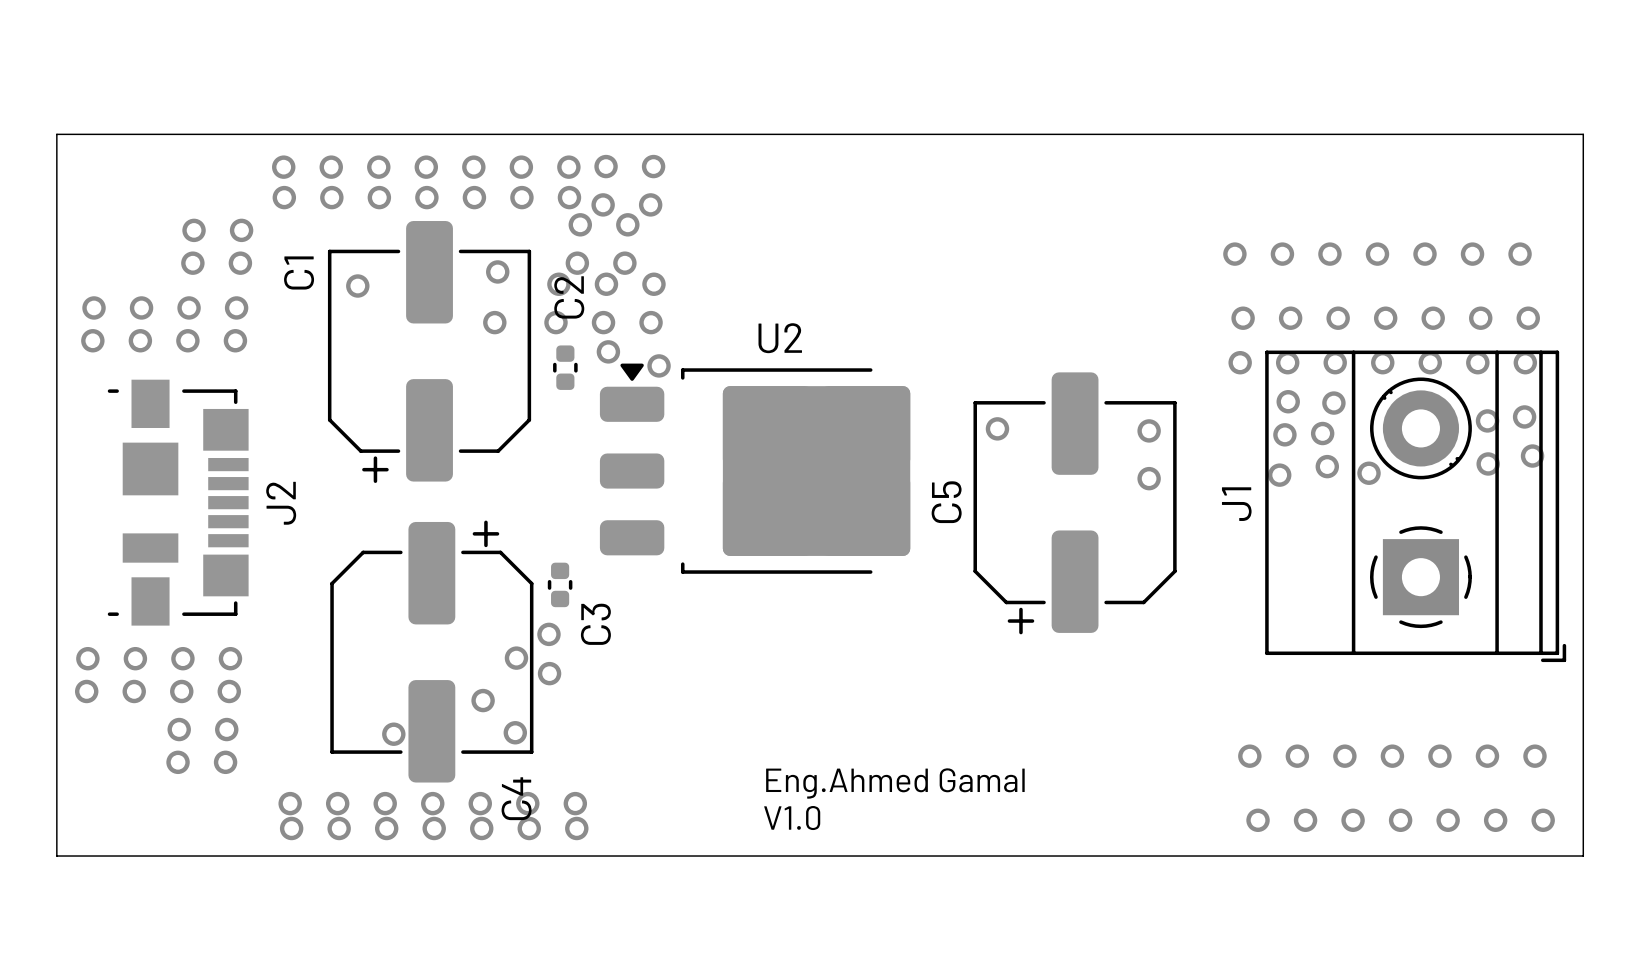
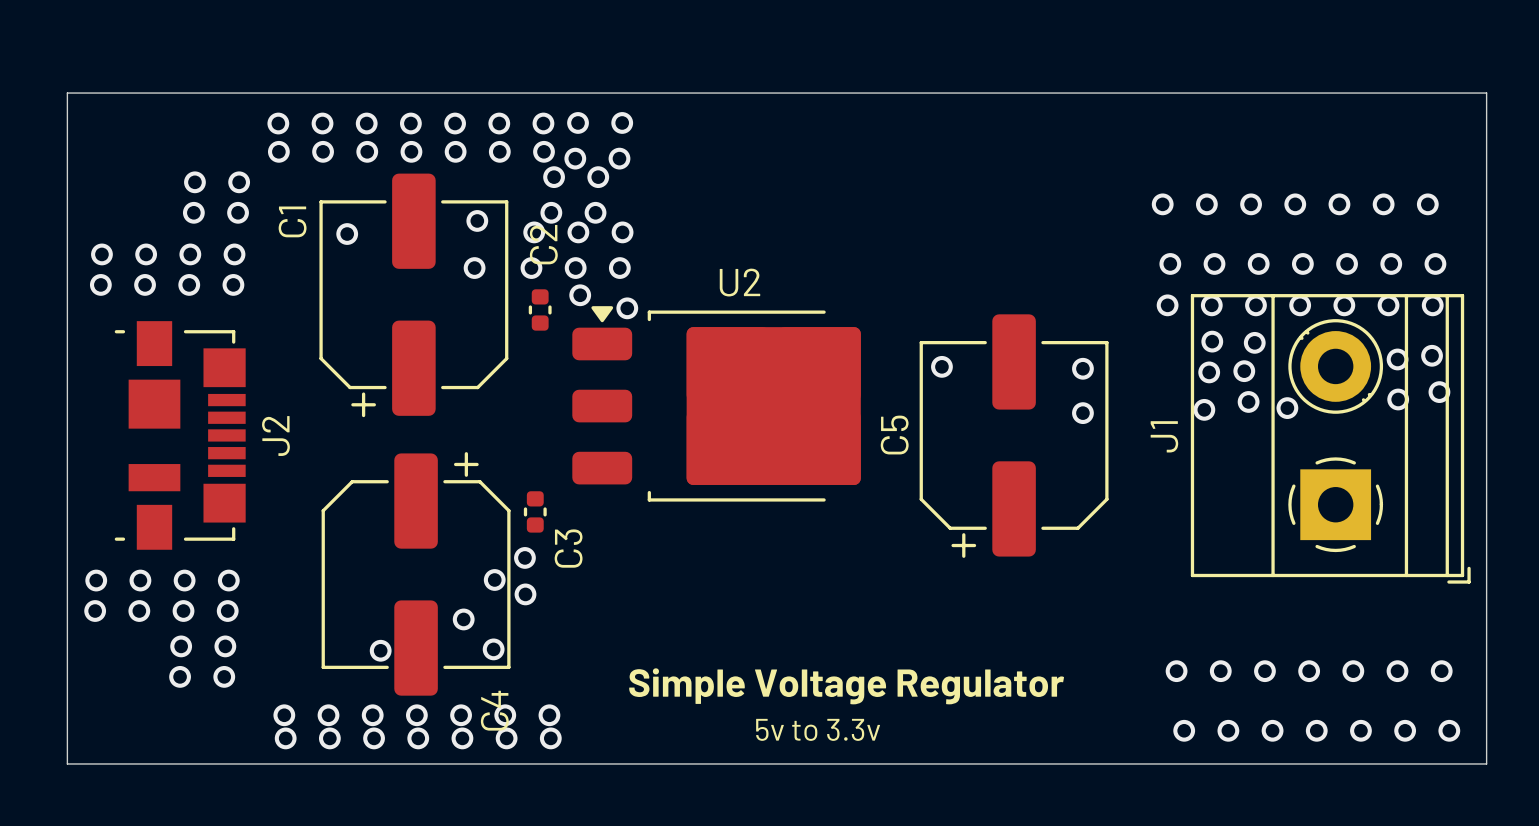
text: none -> Simple Voltage Regulator (846, 686)
text: Eng.Ahmed Gamal (895, 783) -> none
text: V1.0 (792, 818) -> none
text: none -> 5v to 3.3v (818, 729)

